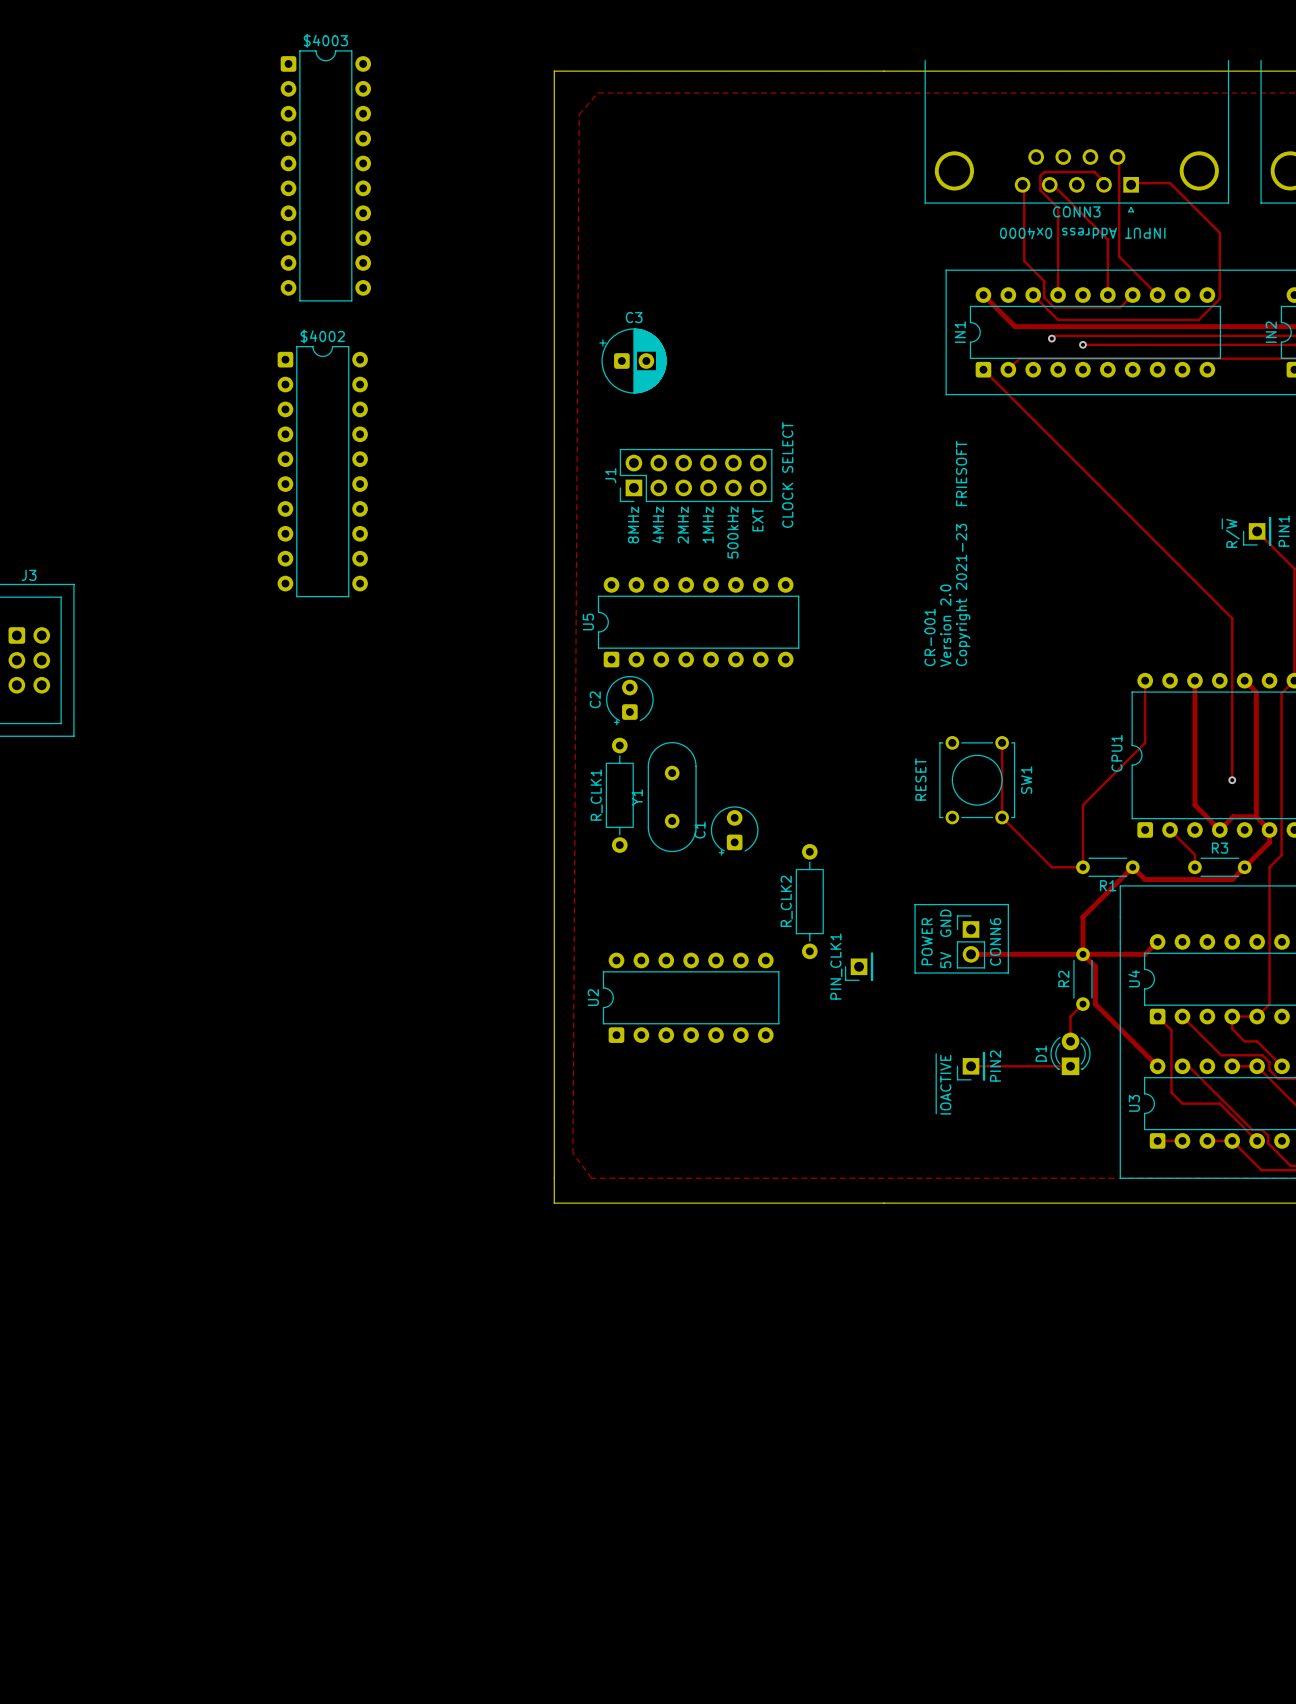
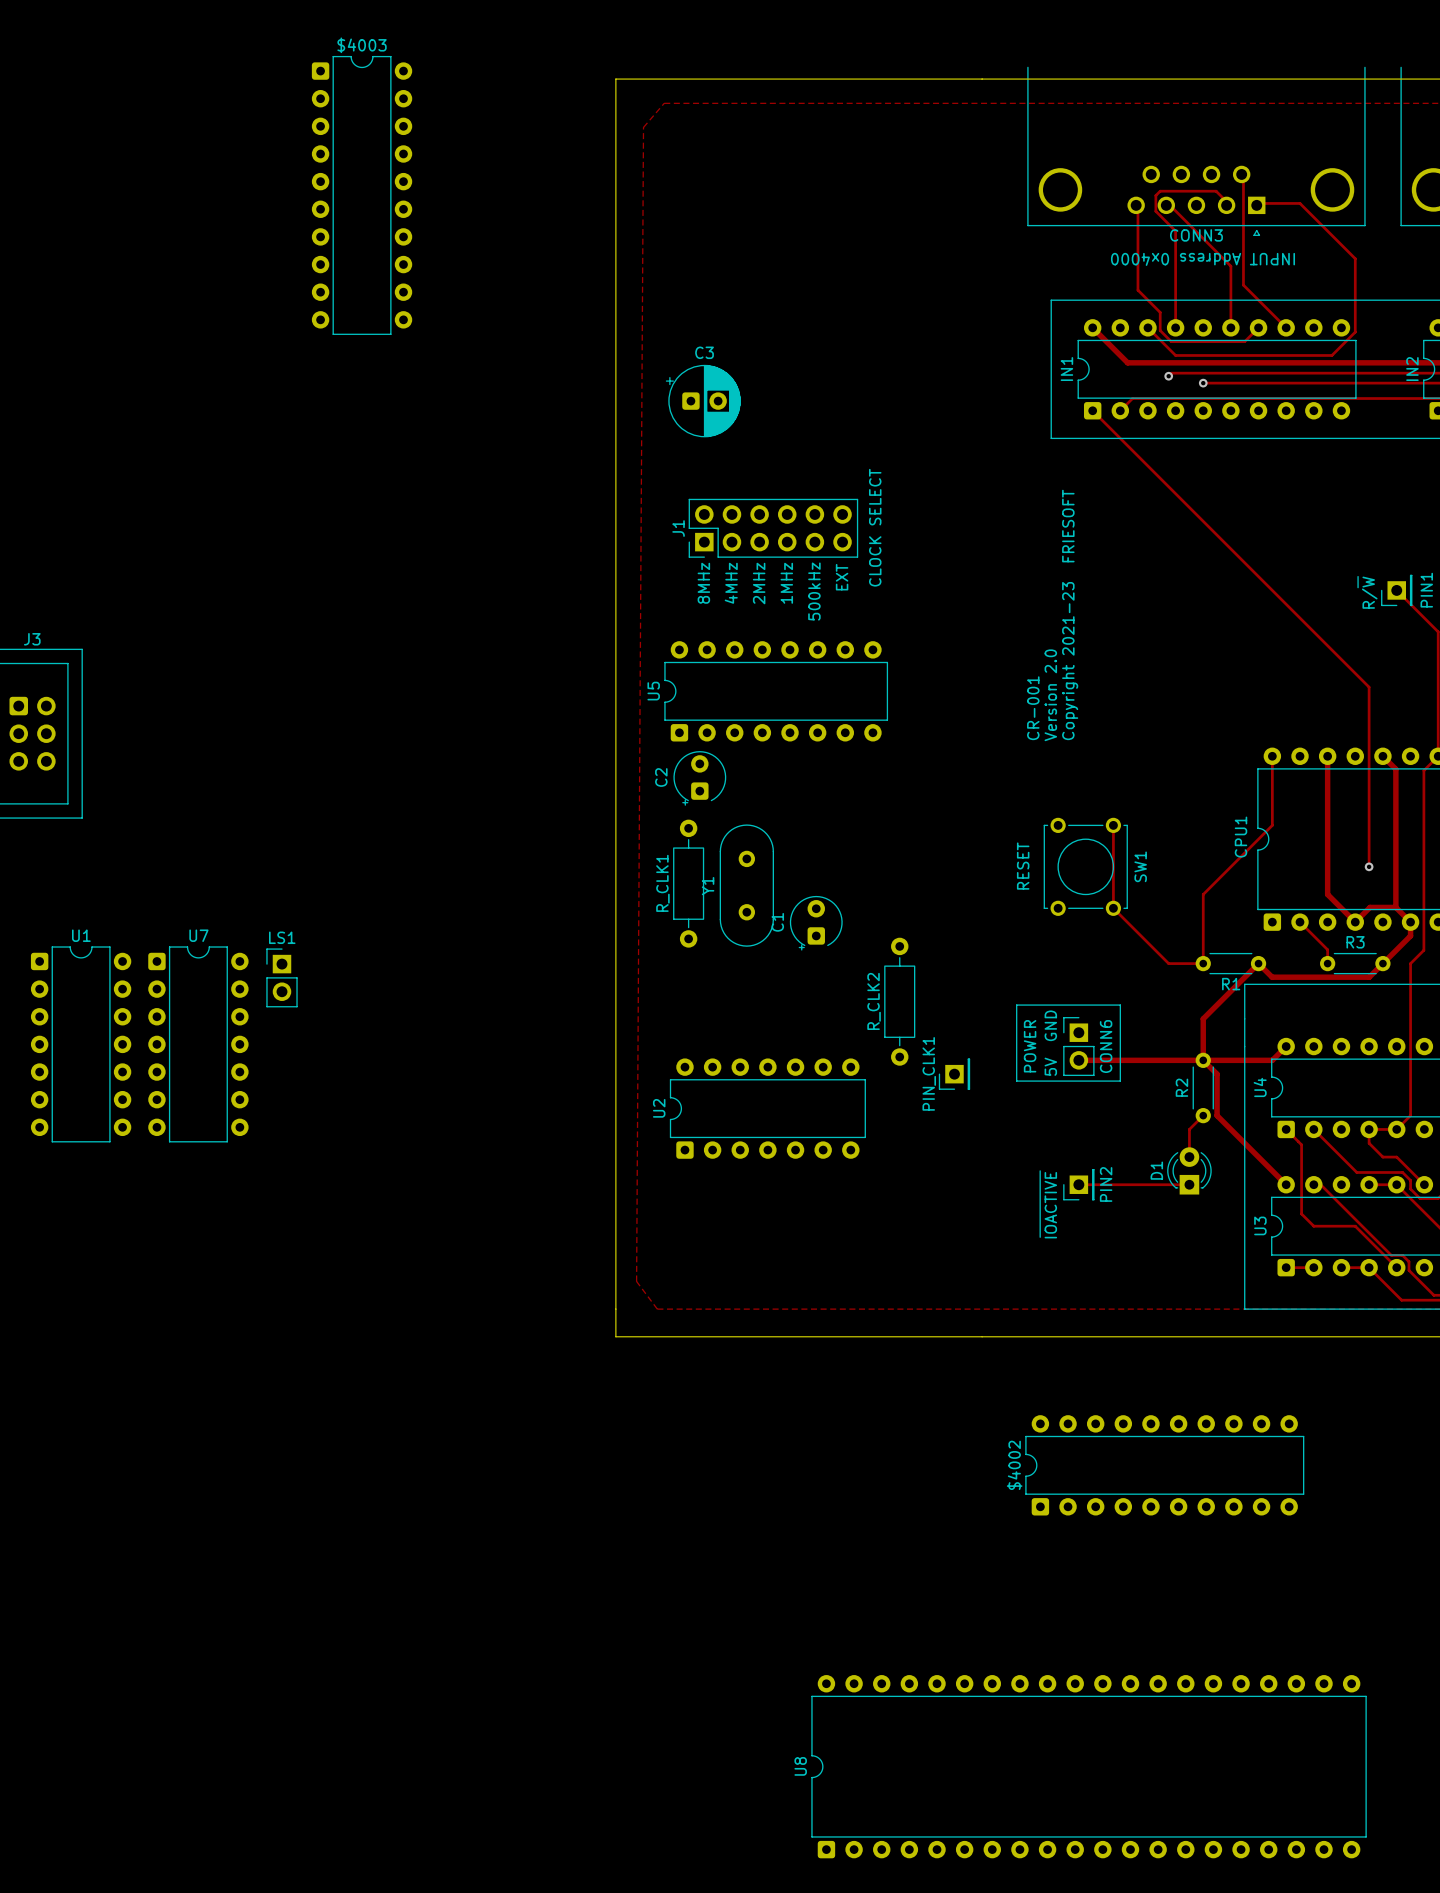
$4002 rotation: 0° (322, 471) -> 90° counterclockwise (1164, 1465)
$4002 position: (322, 471) -> (1164, 1465)
LS1: none -> (281, 977)
U1: none -> (81, 1044)
U7: none -> (198, 1044)
U8: none -> (1089, 1766)

